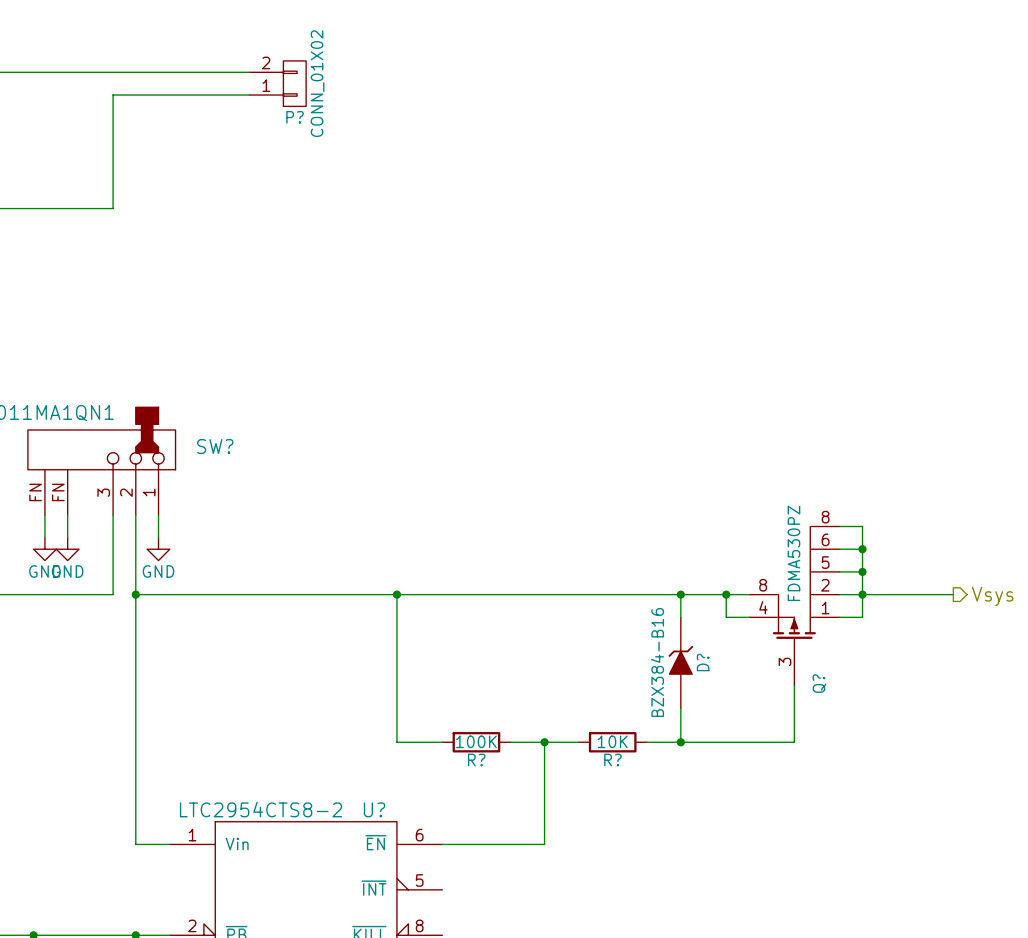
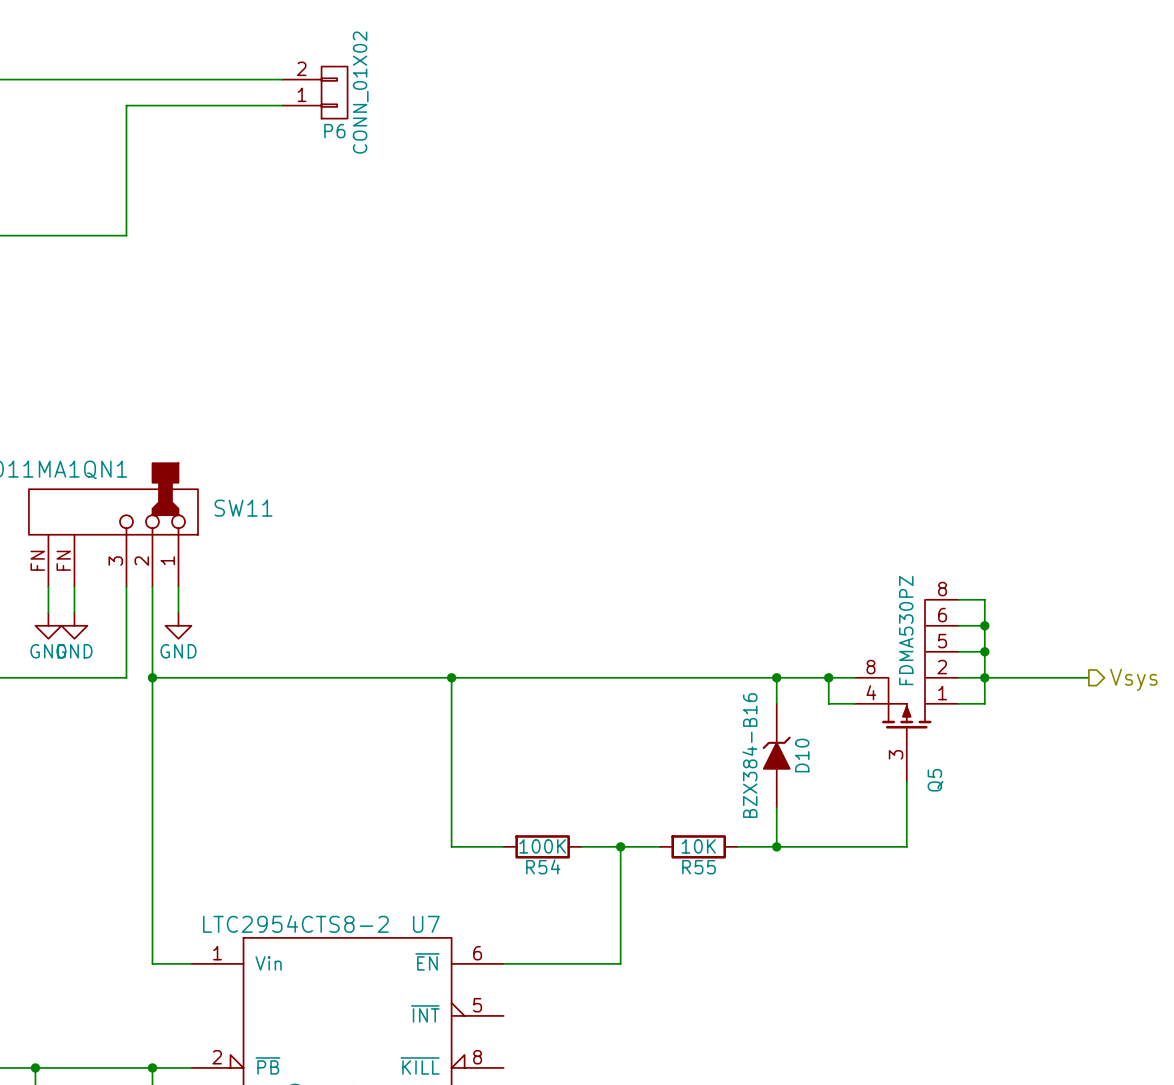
P? name: P? (295, 117) -> P6 (334, 131)
SW? name: SW? (215, 446) -> SW11 (243, 508)
D? name: D? (703, 662) -> D10 (802, 755)
Q? name: Q? (819, 683) -> Q5 (935, 780)
R? name: R? (476, 760) -> R54 (543, 866)
R? name: R? (612, 760) -> R55 (699, 867)
U? name: U? (374, 809) -> U7 (426, 924)

